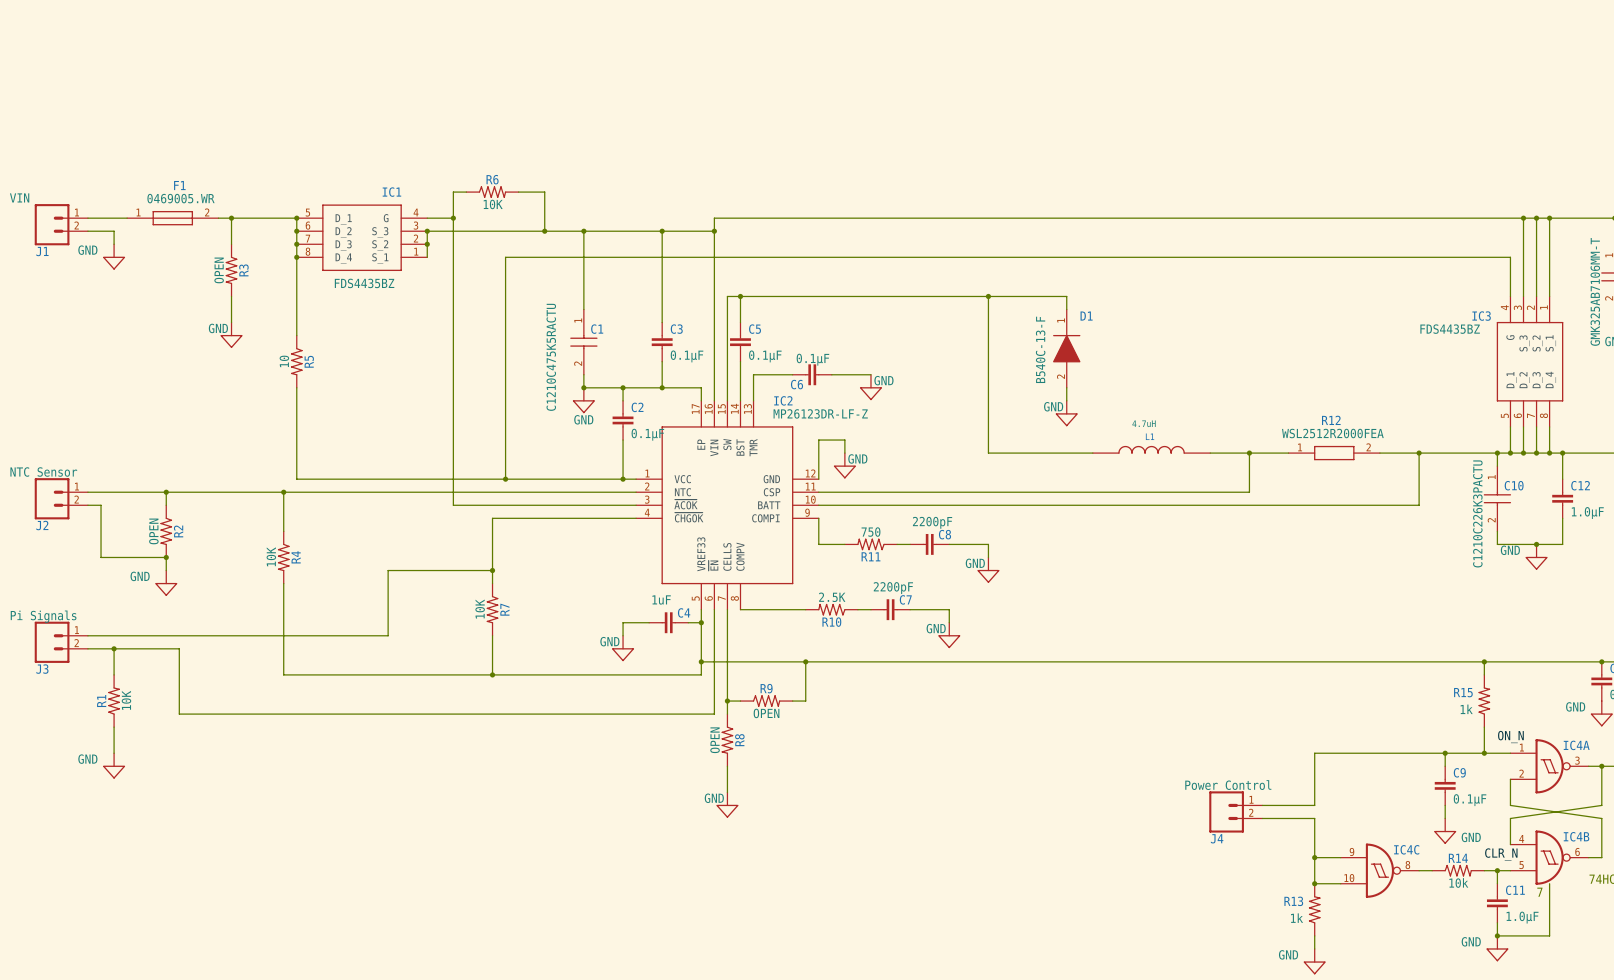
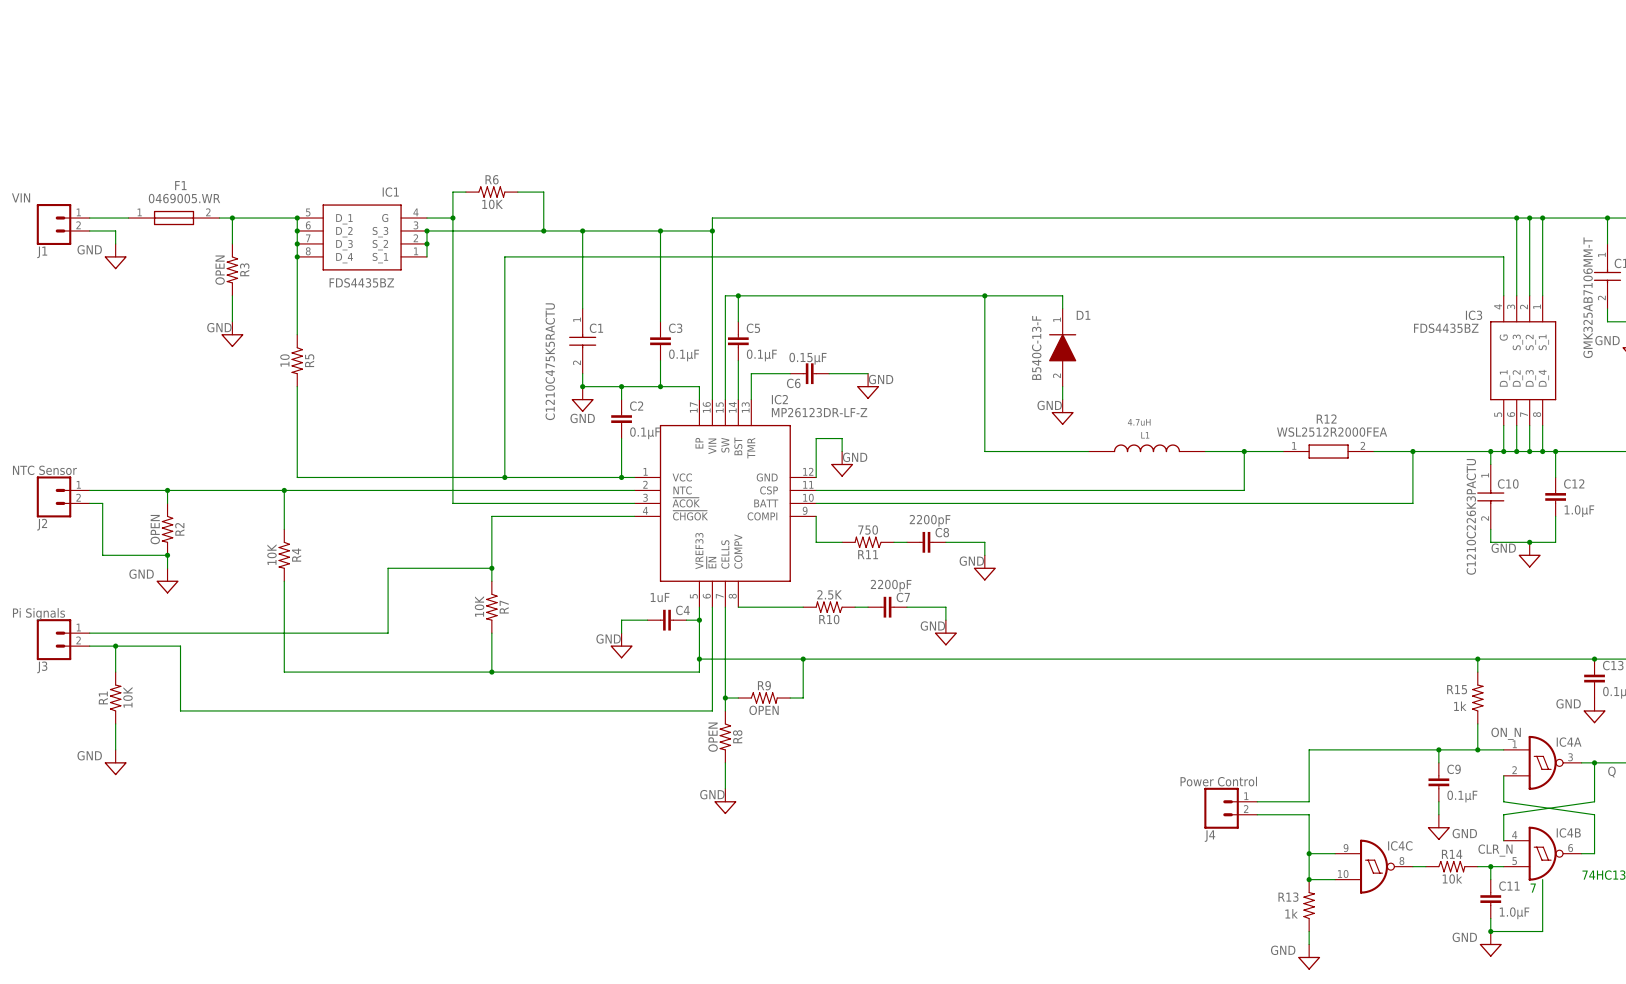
C6 value: 0.1µF (812, 359) -> 0.15µF (807, 358)

